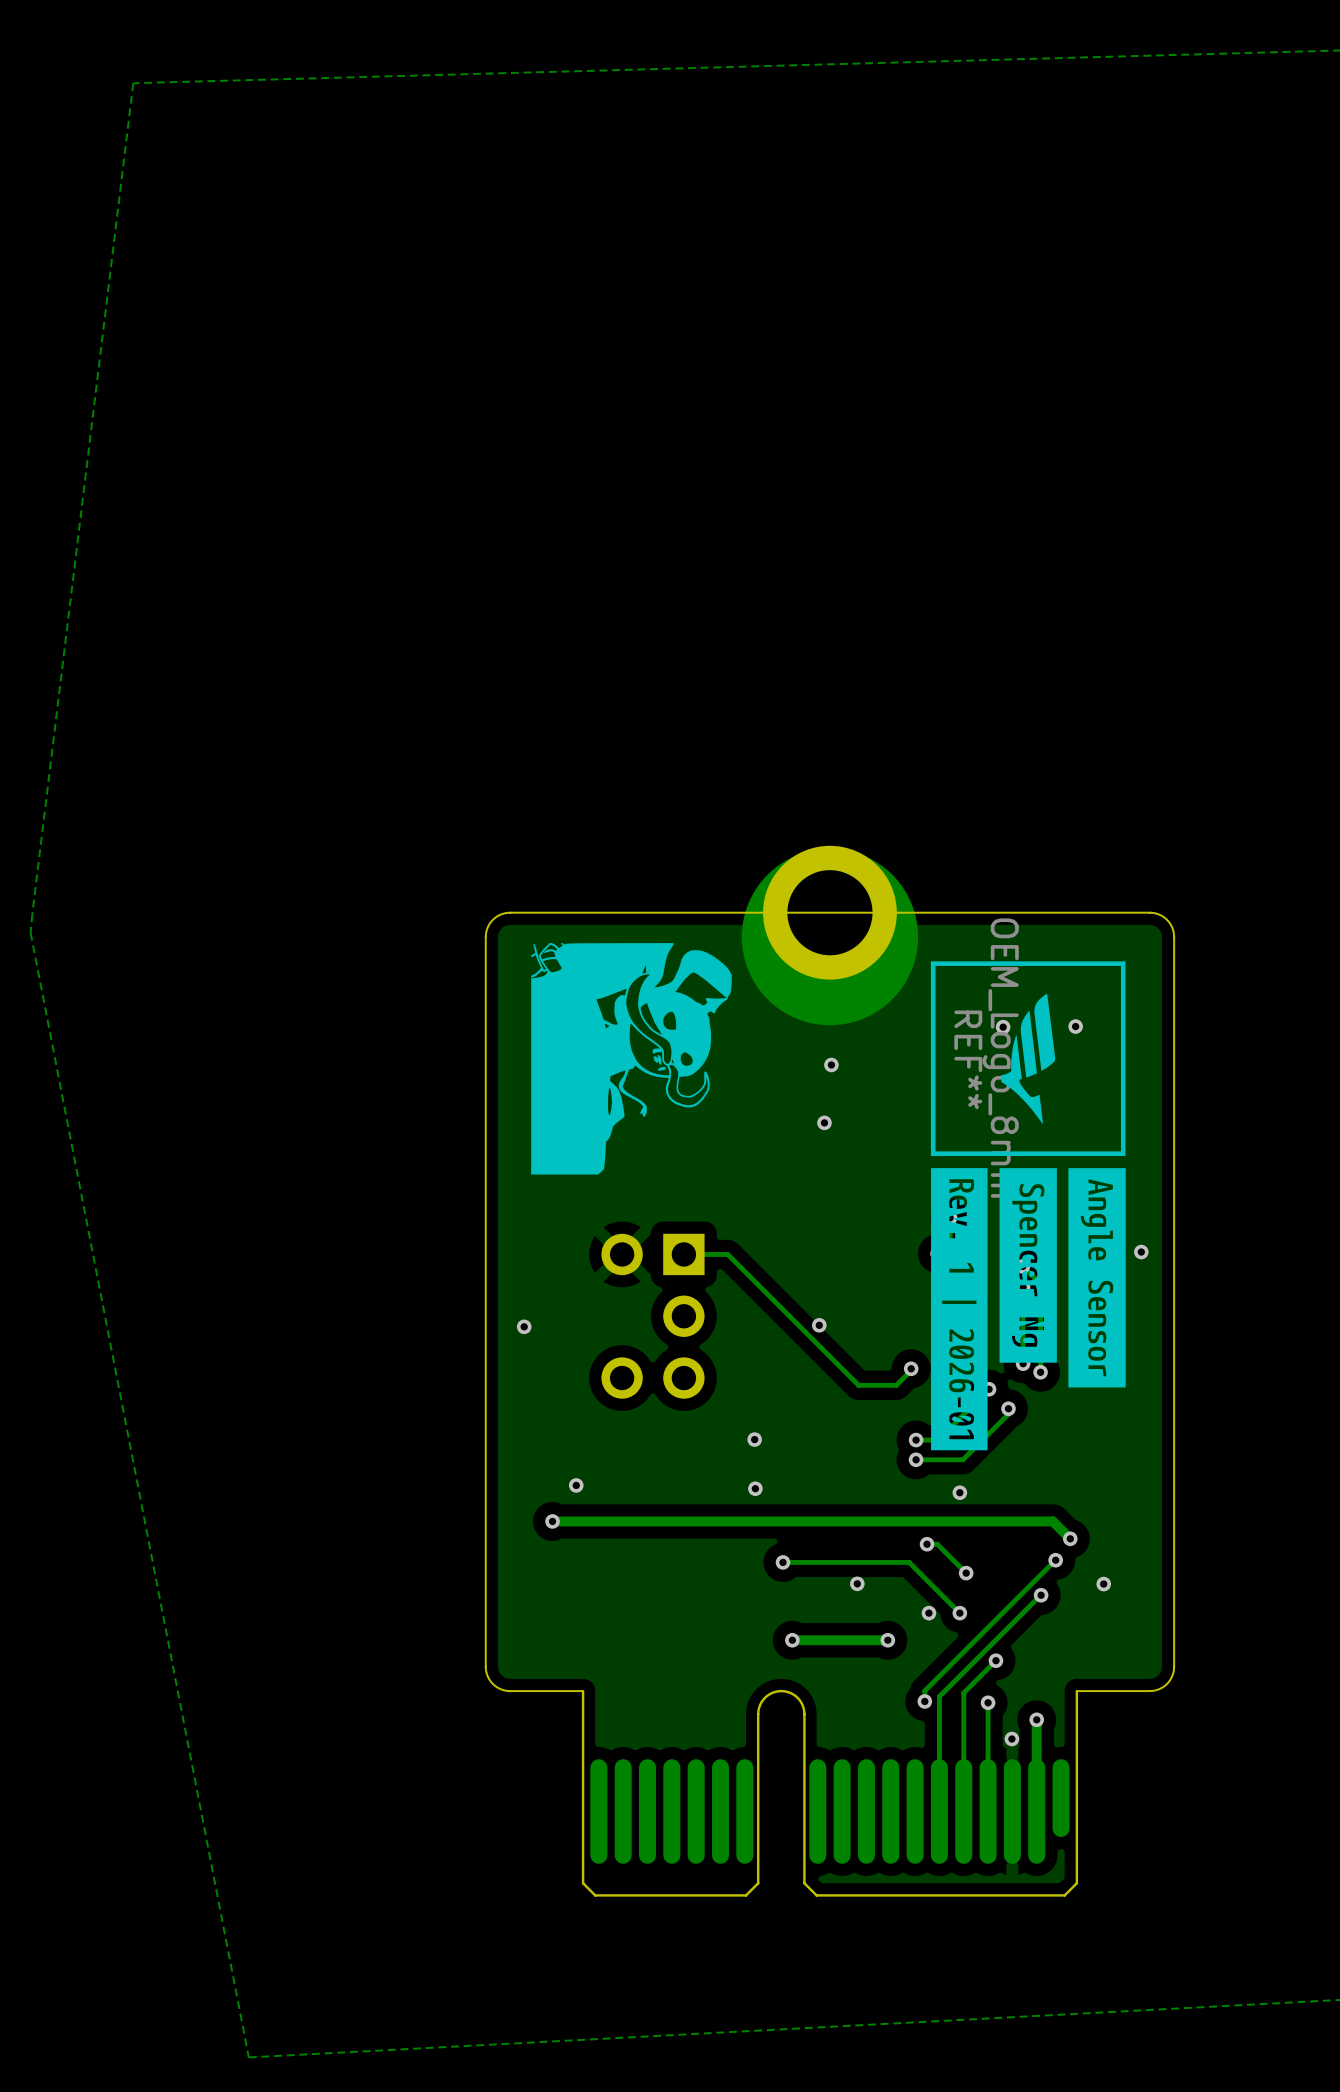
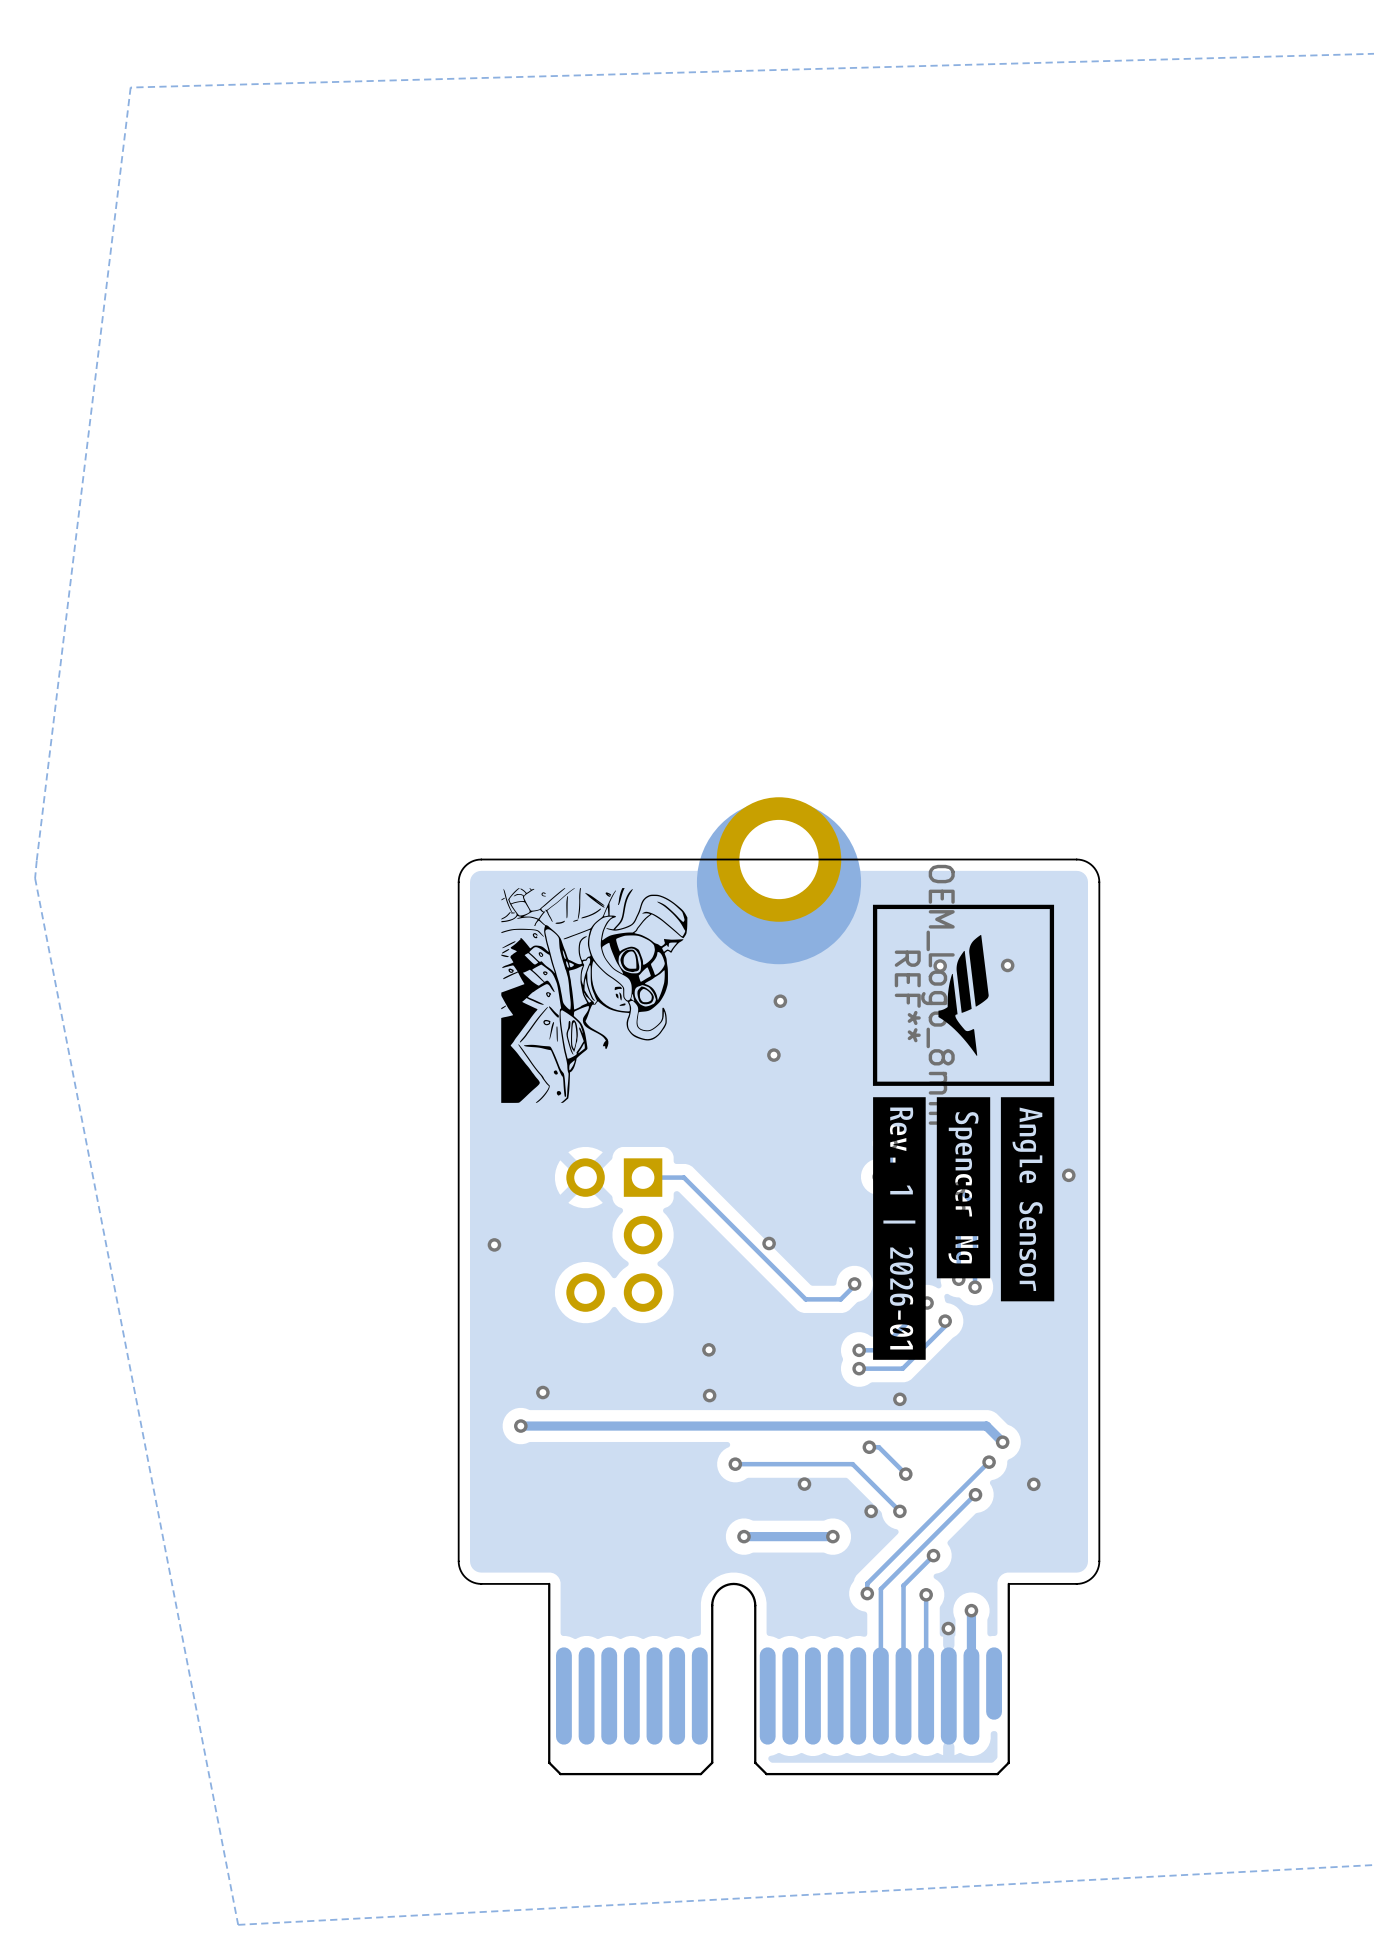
drawing shape: [531, 943, 732, 1175] -> [501, 888, 688, 1103]

